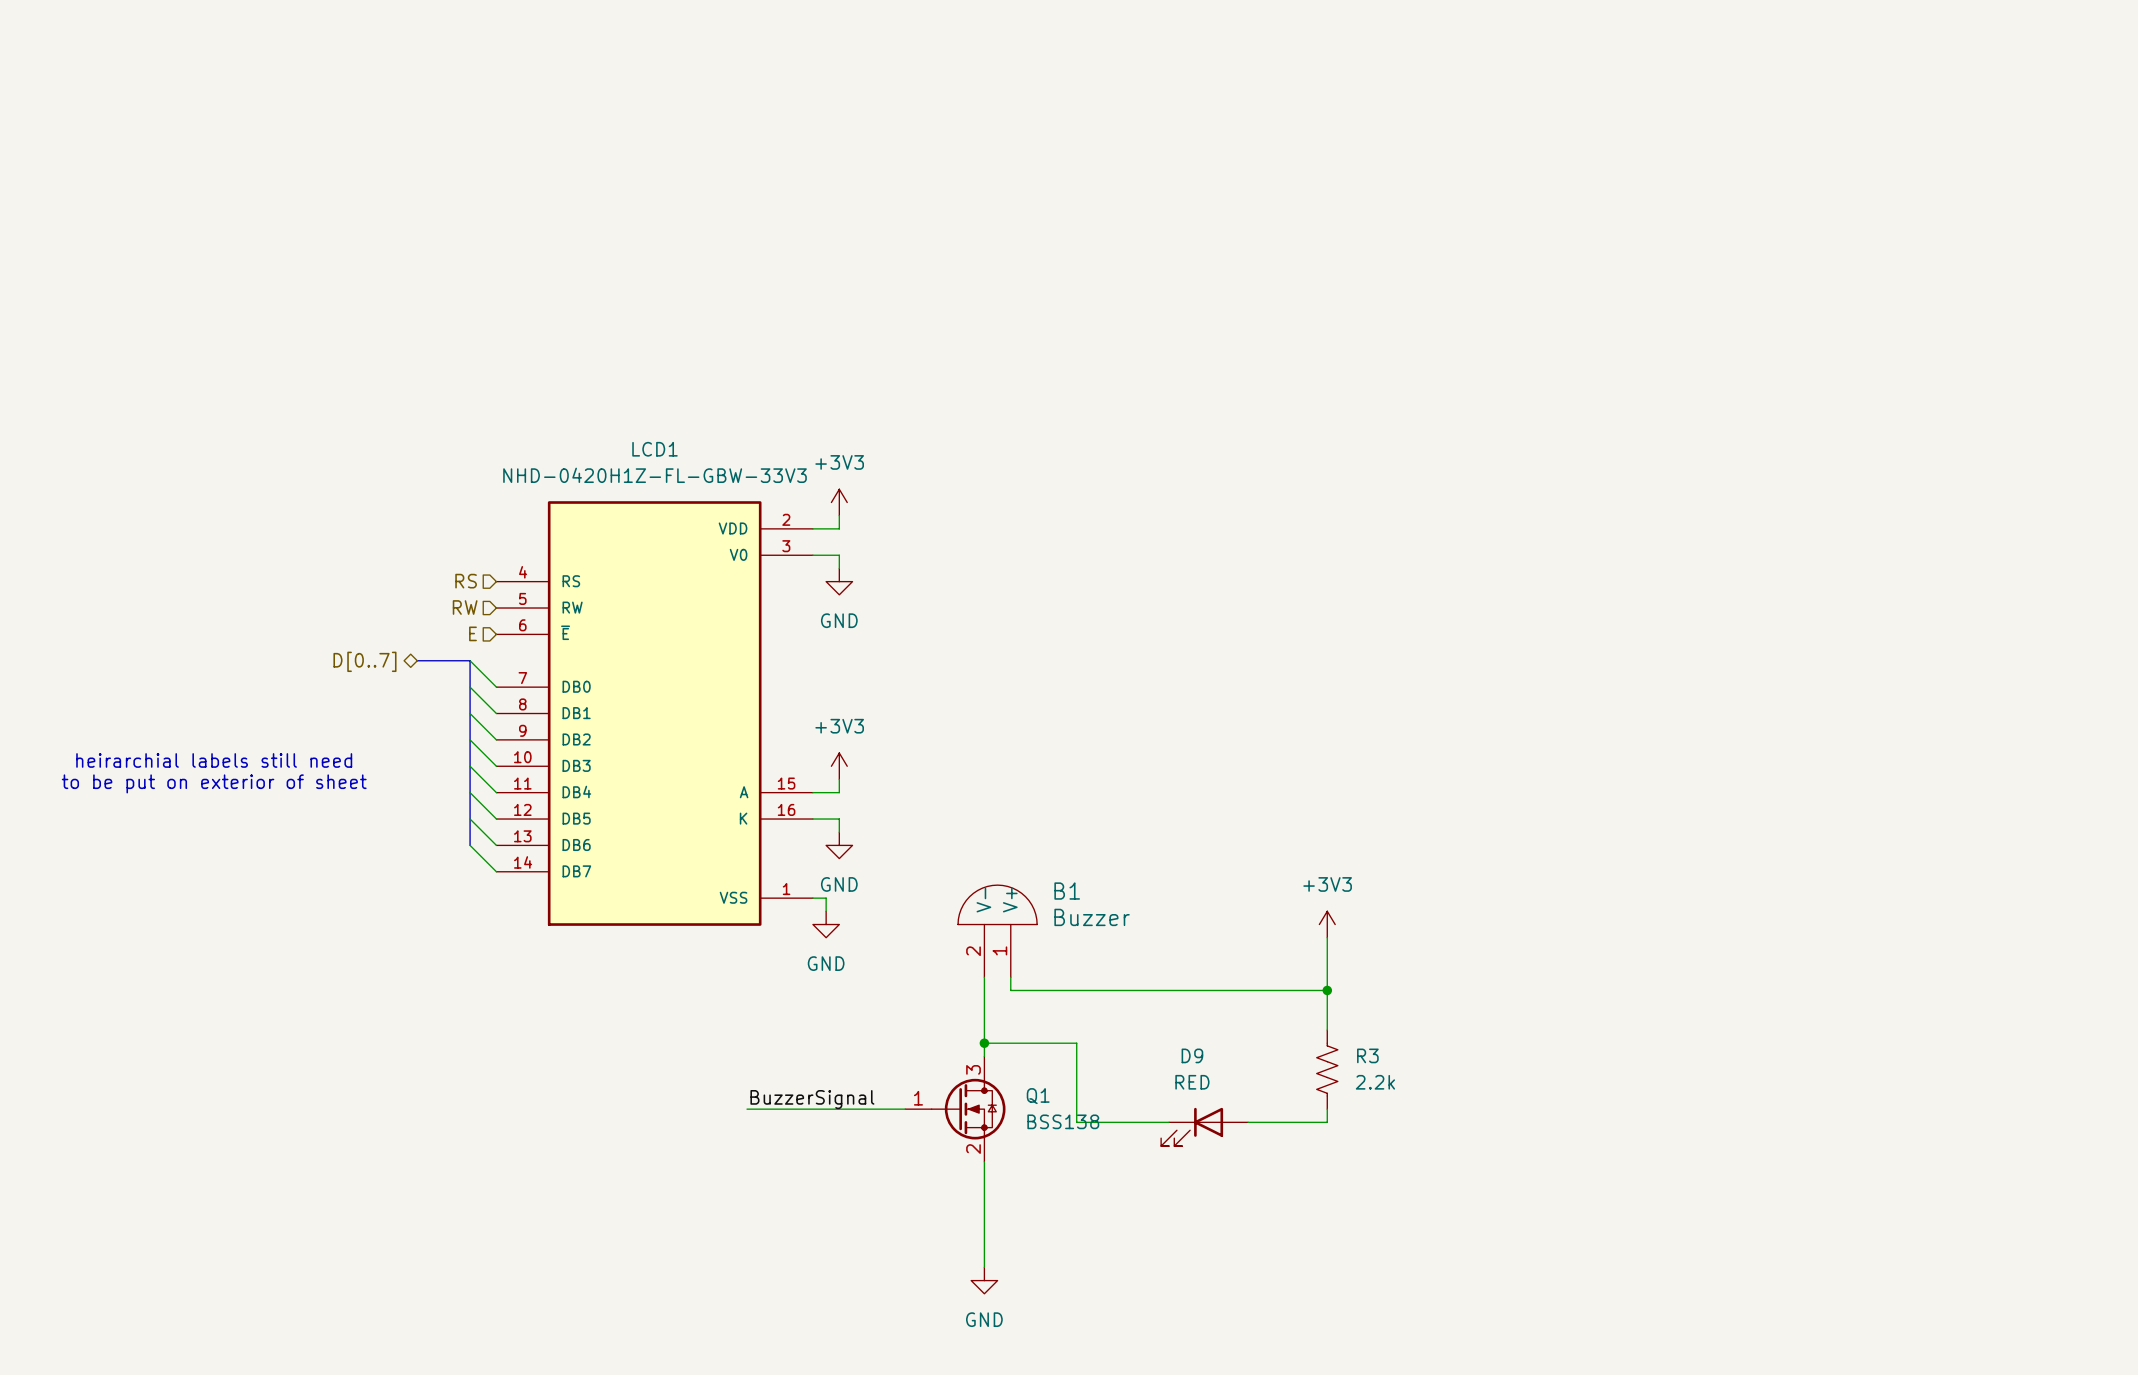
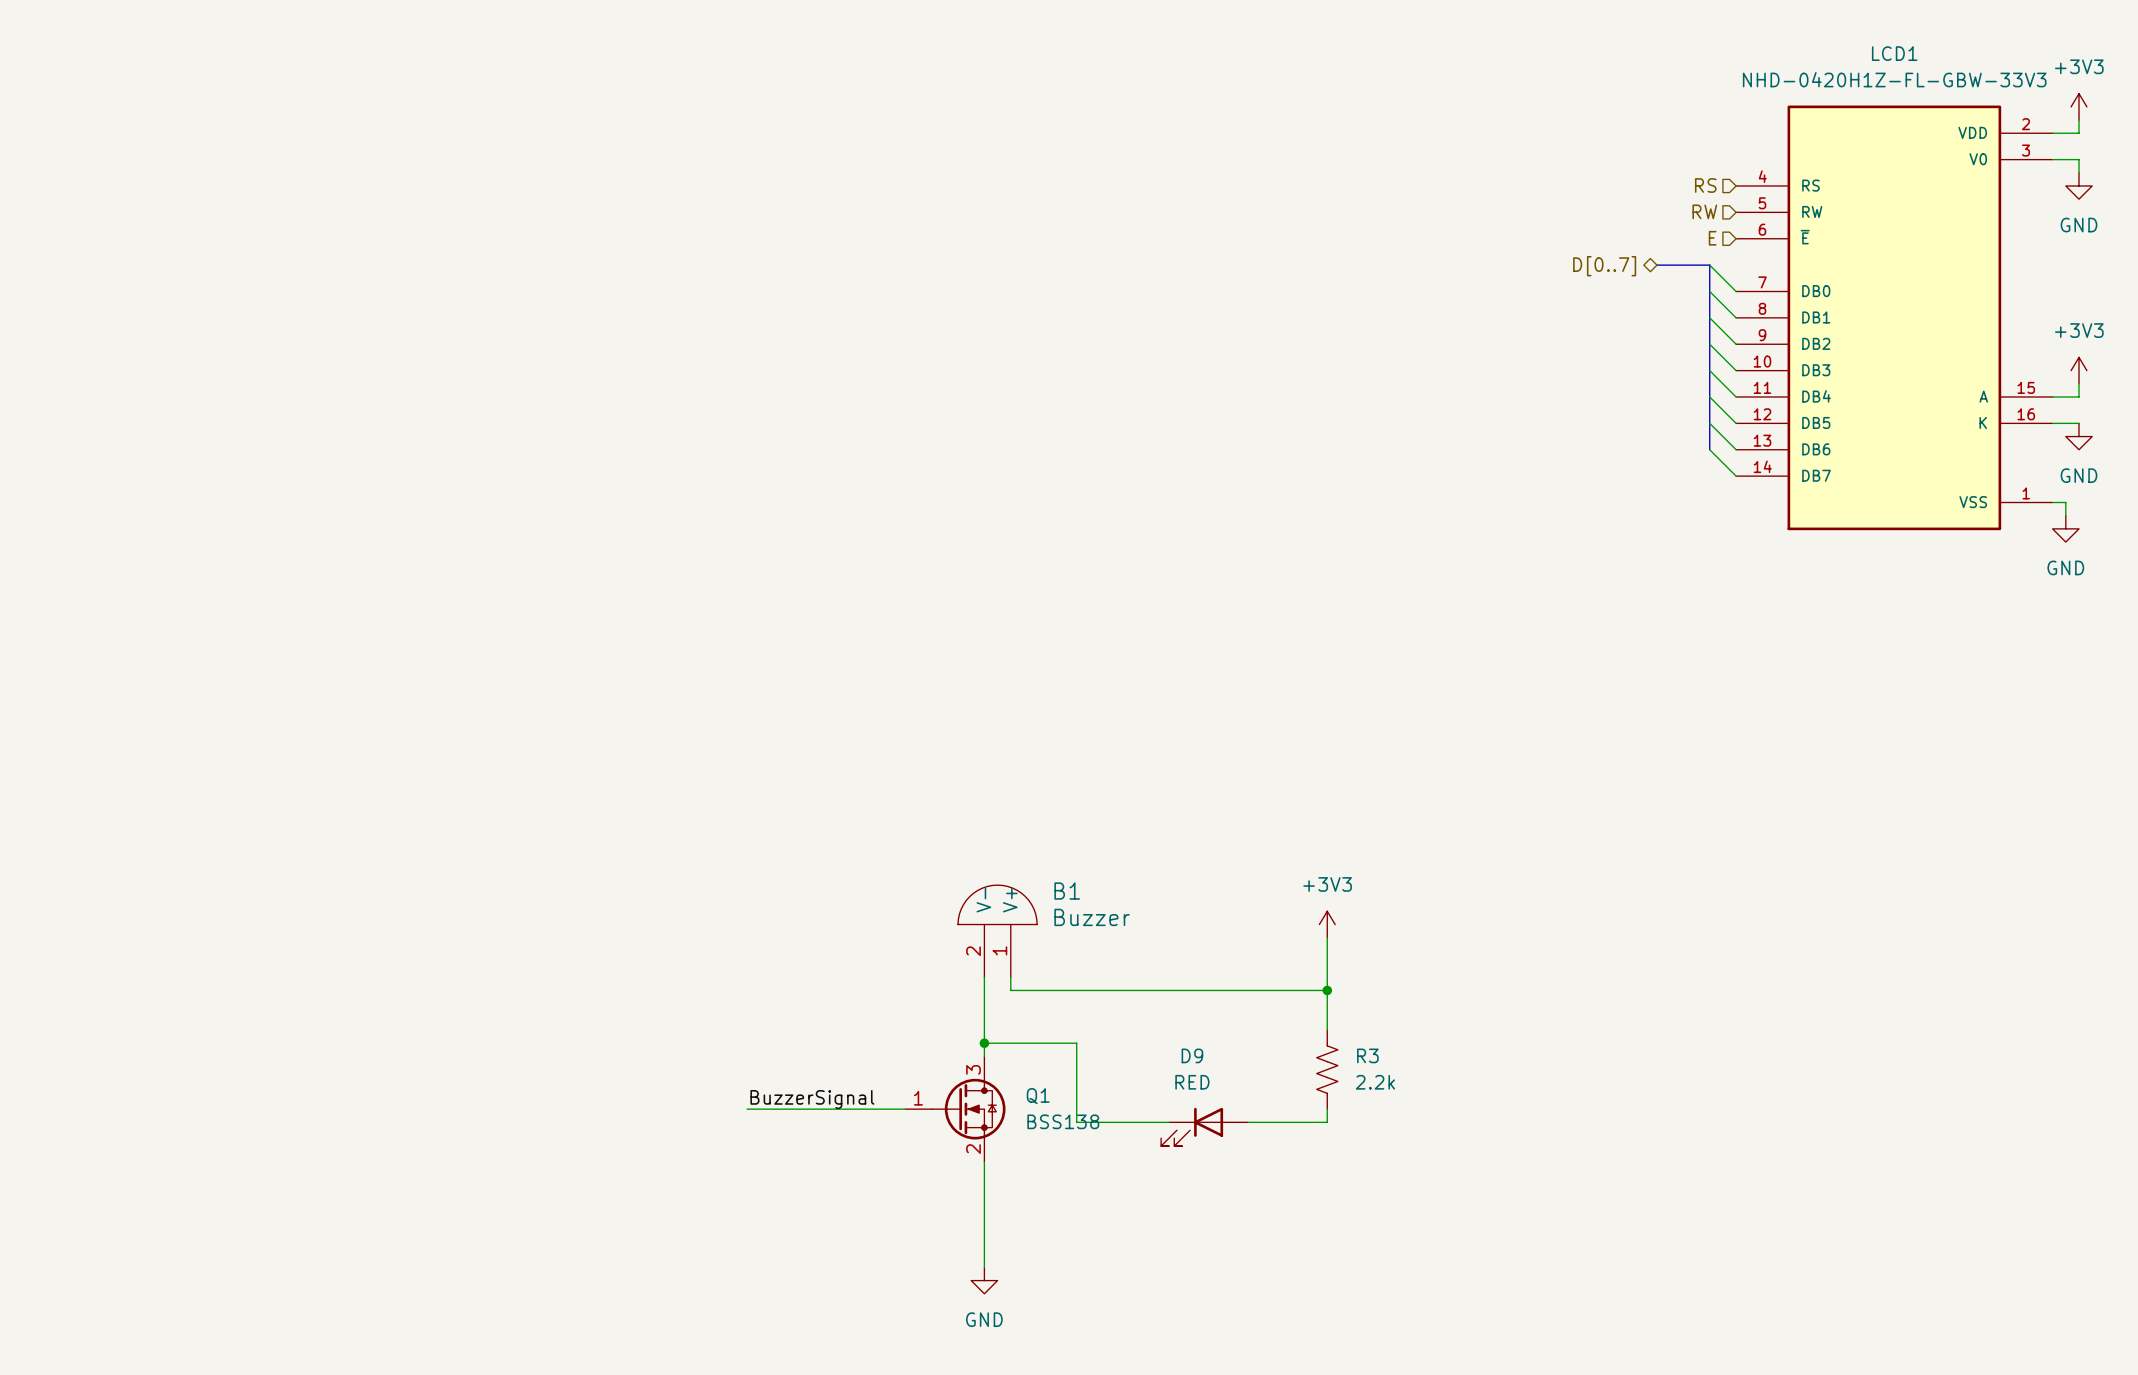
power symbol: none -> +3V3 (2079, 106)
wire: none -> (2079, 120) (2079, 133) (2052, 133)
wire: none -> (2052, 159) (2079, 159) (2079, 172)
hierarchical label: none -> RS (1705, 185)
power symbol: none -> GND (2079, 185)
hierarchical label: none -> RW (1704, 211)
hierarchical label: none -> E (1712, 238)
bus: none -> (1656, 265) (1709, 265) (1709, 449)
wire: none -> (1709, 265) (1736, 291)
hierarchical label: none -> D[0..7] (1604, 266)
wire: none -> (1709, 291) (1736, 317)
wire: none -> (1709, 317) (1736, 344)
wire: none -> (1709, 344) (1736, 370)
wire: none -> (1709, 370) (1736, 397)
power symbol: none -> +3V3 (2079, 370)
wire: none -> (2079, 383) (2079, 397) (2052, 397)
wire: none -> (1709, 397) (1736, 423)
wire: none -> (1709, 423) (1736, 449)
wire: none -> (2052, 423) (2079, 423)
power symbol: none -> GND (2079, 436)
wire: none -> (1709, 449) (1736, 476)
power symbol: +3V3 (839, 502) -> none
wire: none -> (2052, 502) (2065, 502) (2065, 515)
wire: (839, 515) (839, 528) (812, 528) -> none
power symbol: none -> GND (2065, 528)
wire: (812, 555) (839, 555) (839, 568) -> none
hierarchical label: RS (466, 581) -> none
power symbol: GND (839, 581) -> none
hierarchical label: RW (465, 607) -> none
hierarchical label: E (472, 633) -> none
bus: (417, 660) (470, 660) (470, 845) -> none
wire: (470, 660) (496, 687) -> none
hierarchical label: D[0..7] (364, 661) -> none
wire: (470, 687) (496, 713) -> none
wire: (470, 713) (496, 739) -> none
LCD1 position: (654, 713) -> (1894, 317)
wire: (470, 739) (496, 766) -> none
text: heirarchial labels still need (214, 760) -> none
wire: (470, 766) (496, 792) -> none
power symbol: +3V3 (839, 766) -> none
wire: (839, 779) (839, 792) (812, 792) -> none
text: to be put on exterior of sheet (214, 783) -> none
wire: (470, 792) (496, 819) -> none
wire: (470, 819) (496, 845) -> none
wire: (812, 819) (839, 819) (839, 832) -> none
wire: (470, 845) (496, 871) -> none
power symbol: GND (839, 845) -> none
wire: (812, 898) (826, 898) (826, 911) -> none
power symbol: GND (826, 924) -> none

